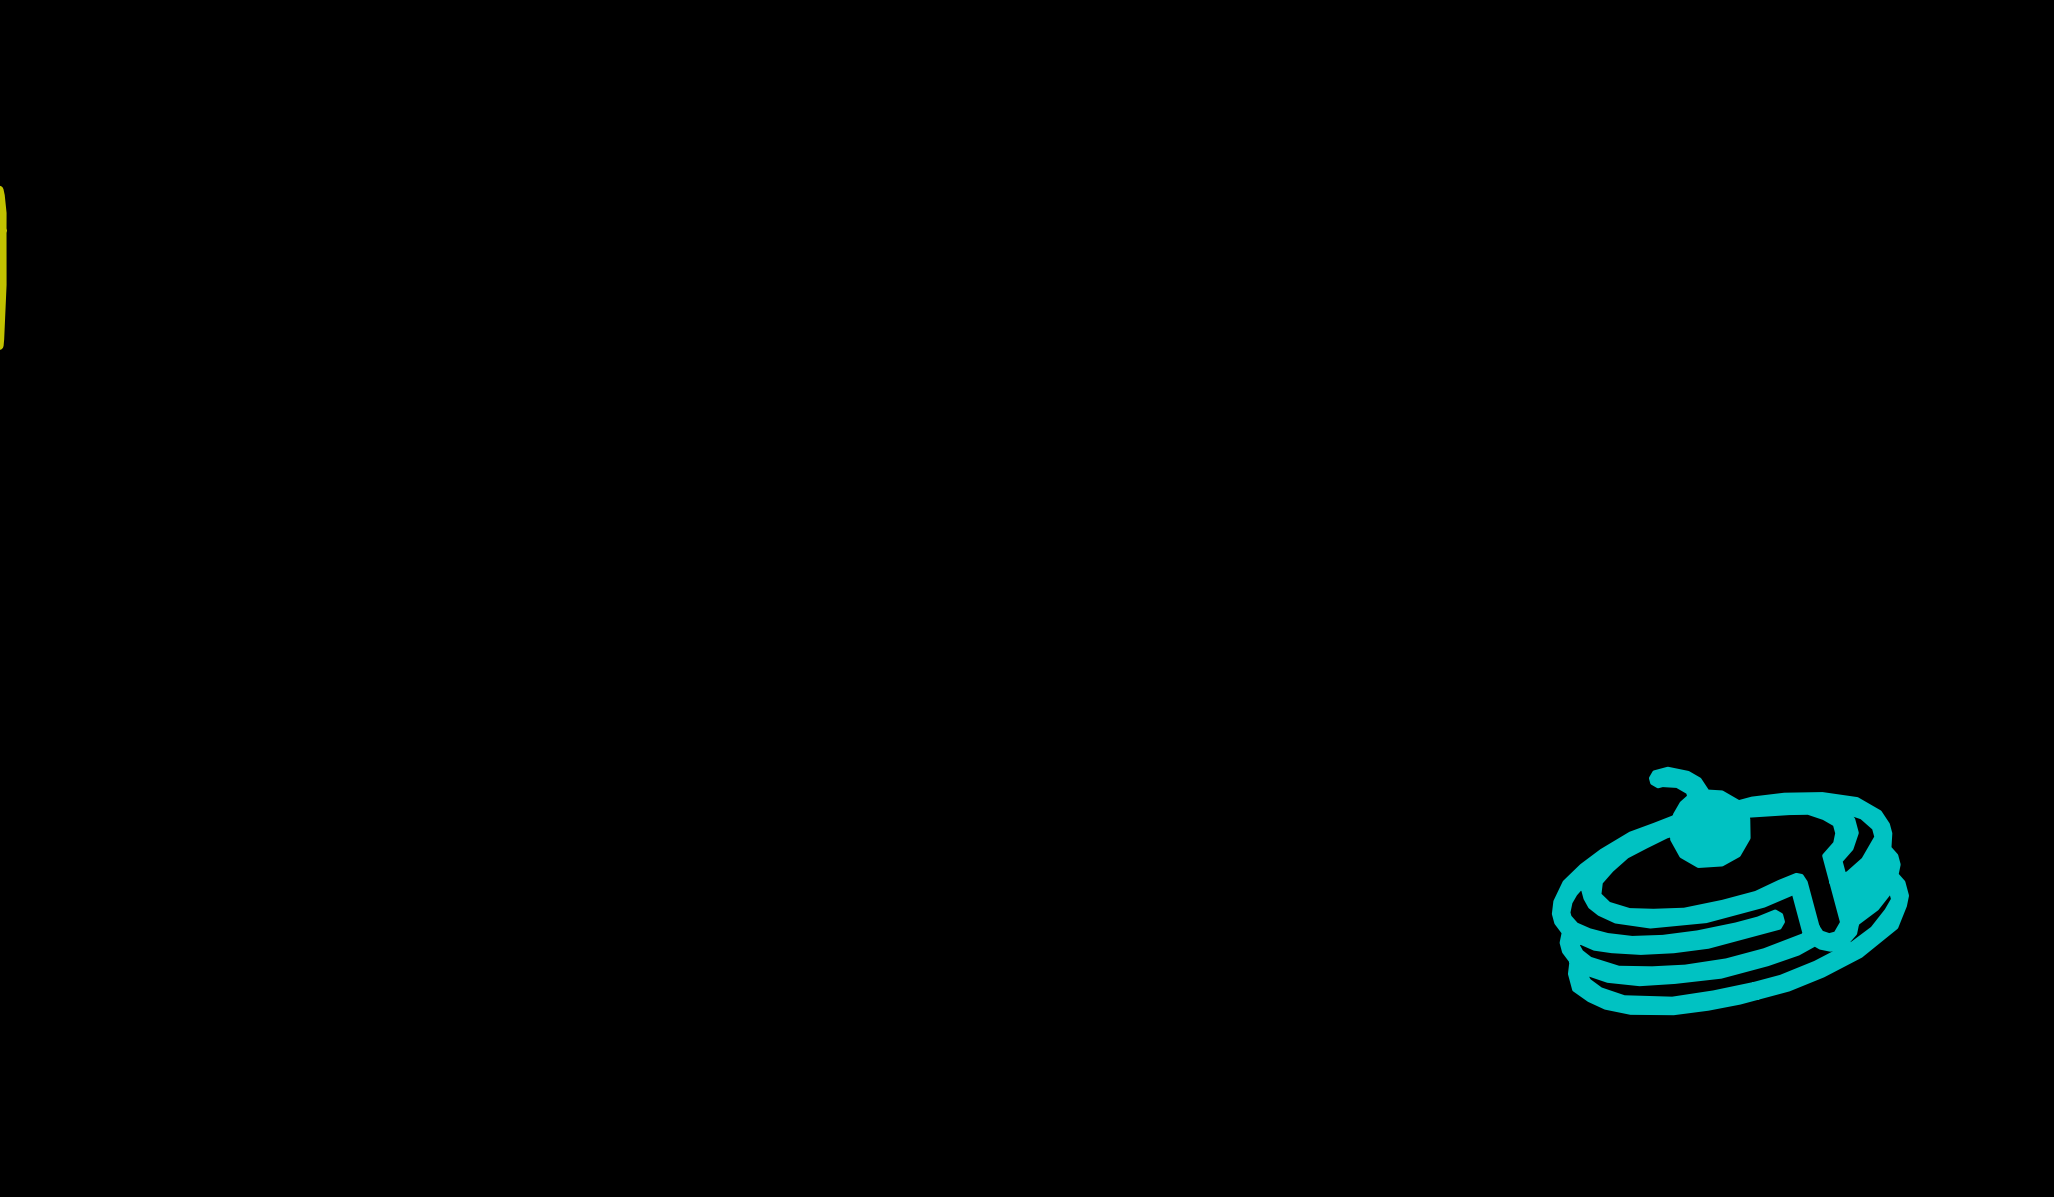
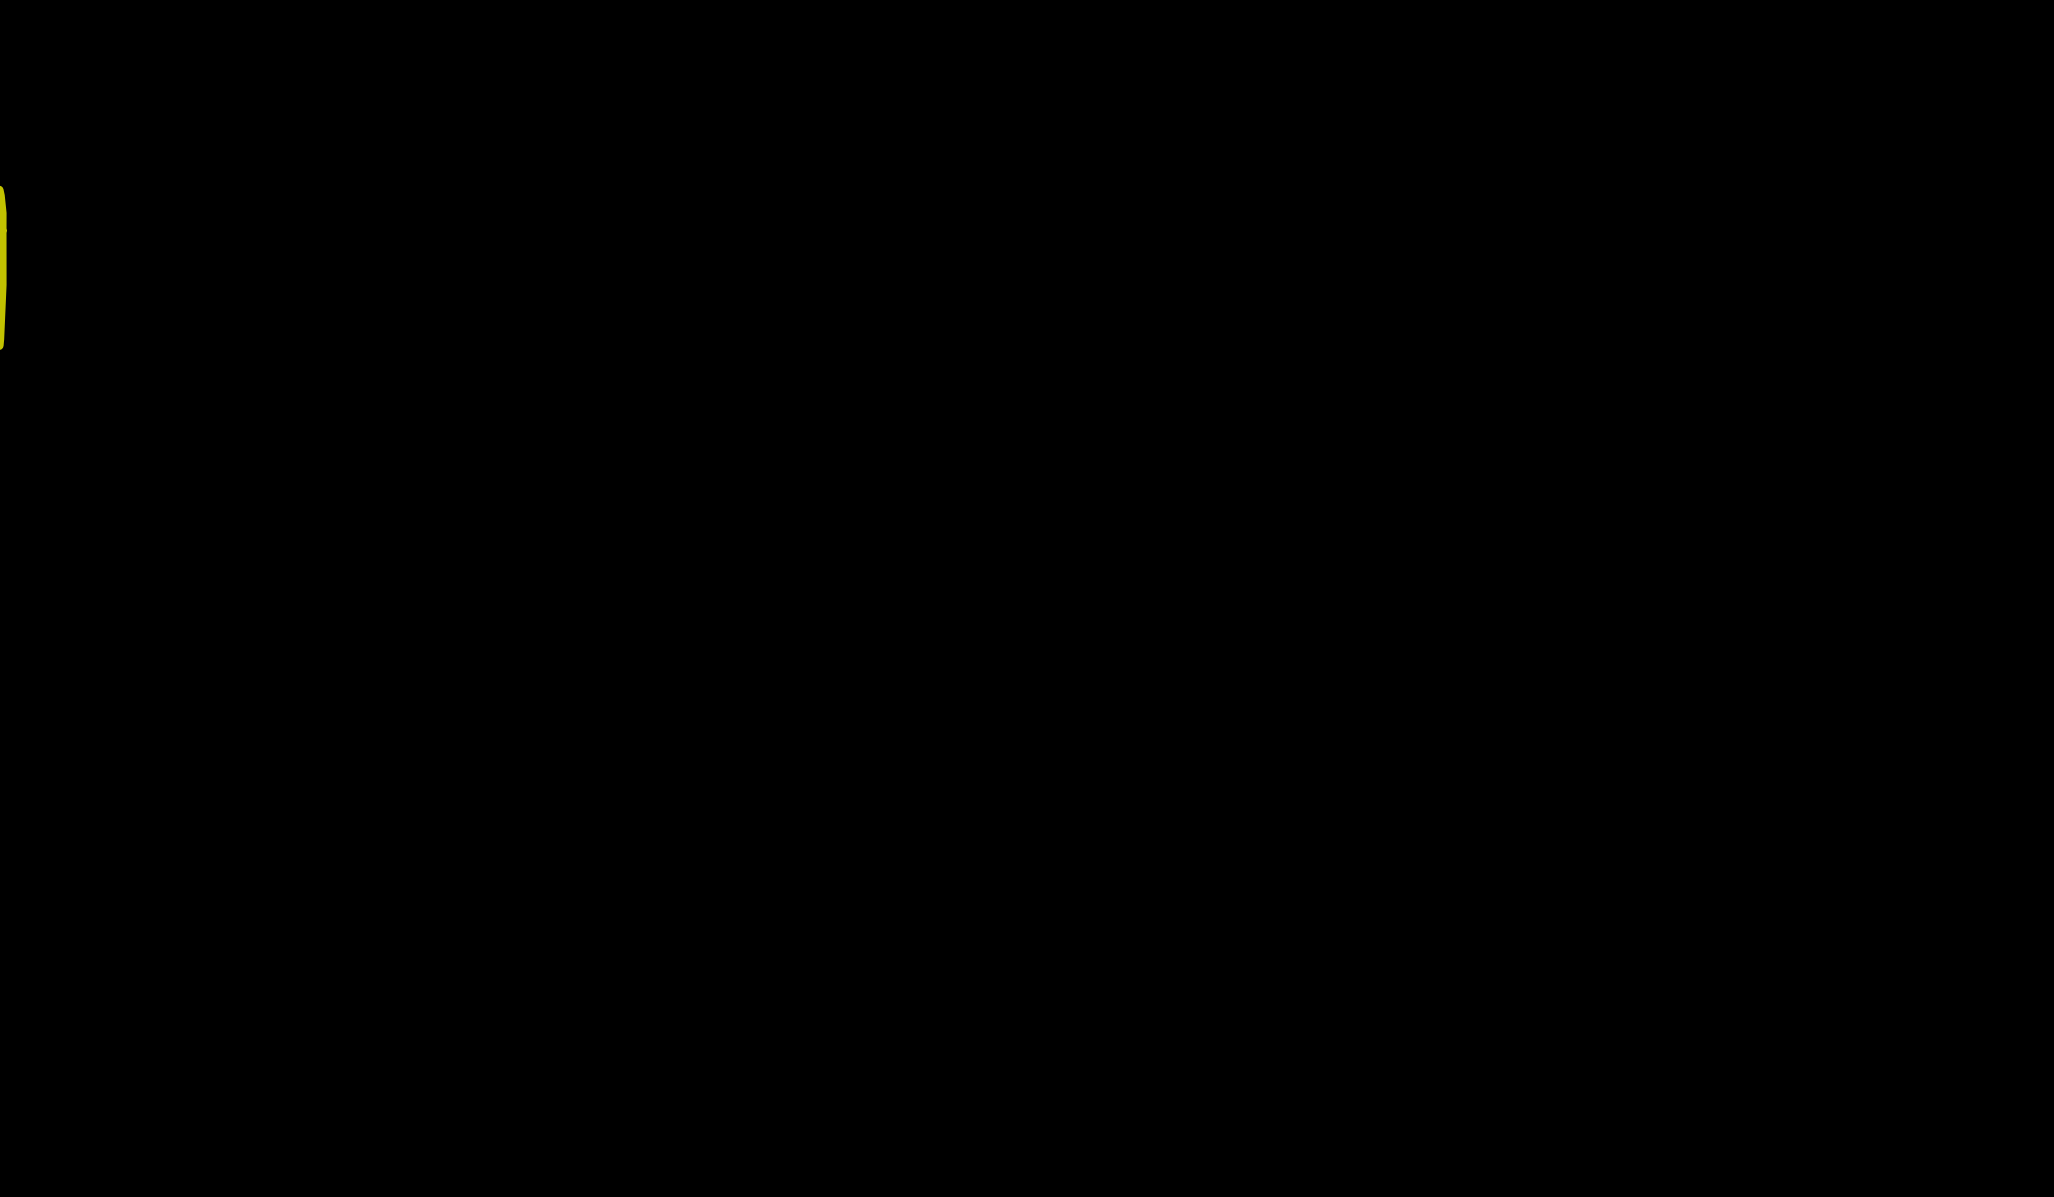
drawing: [1551, 766, 1909, 1016] -> none

